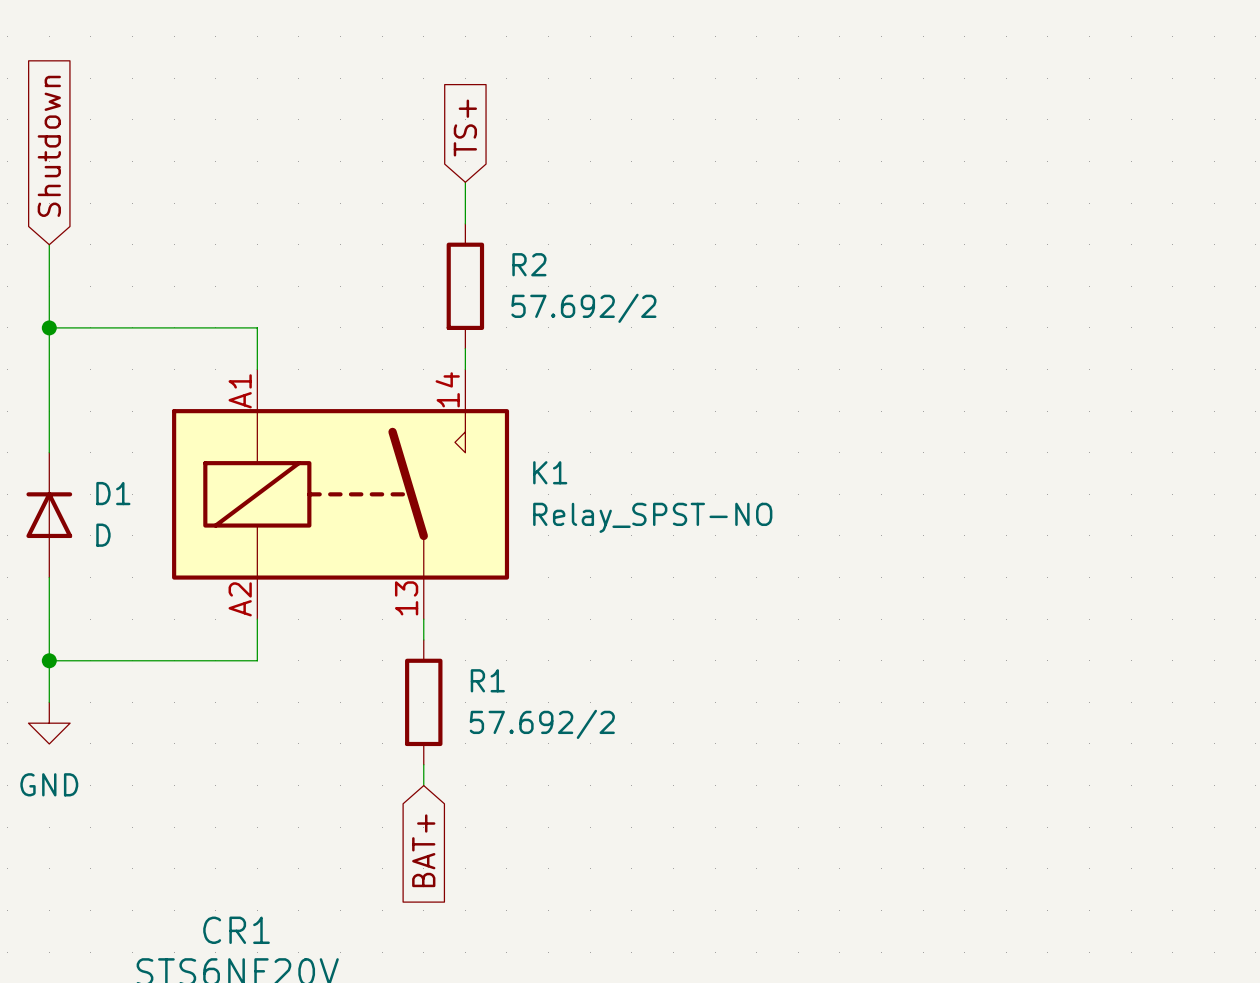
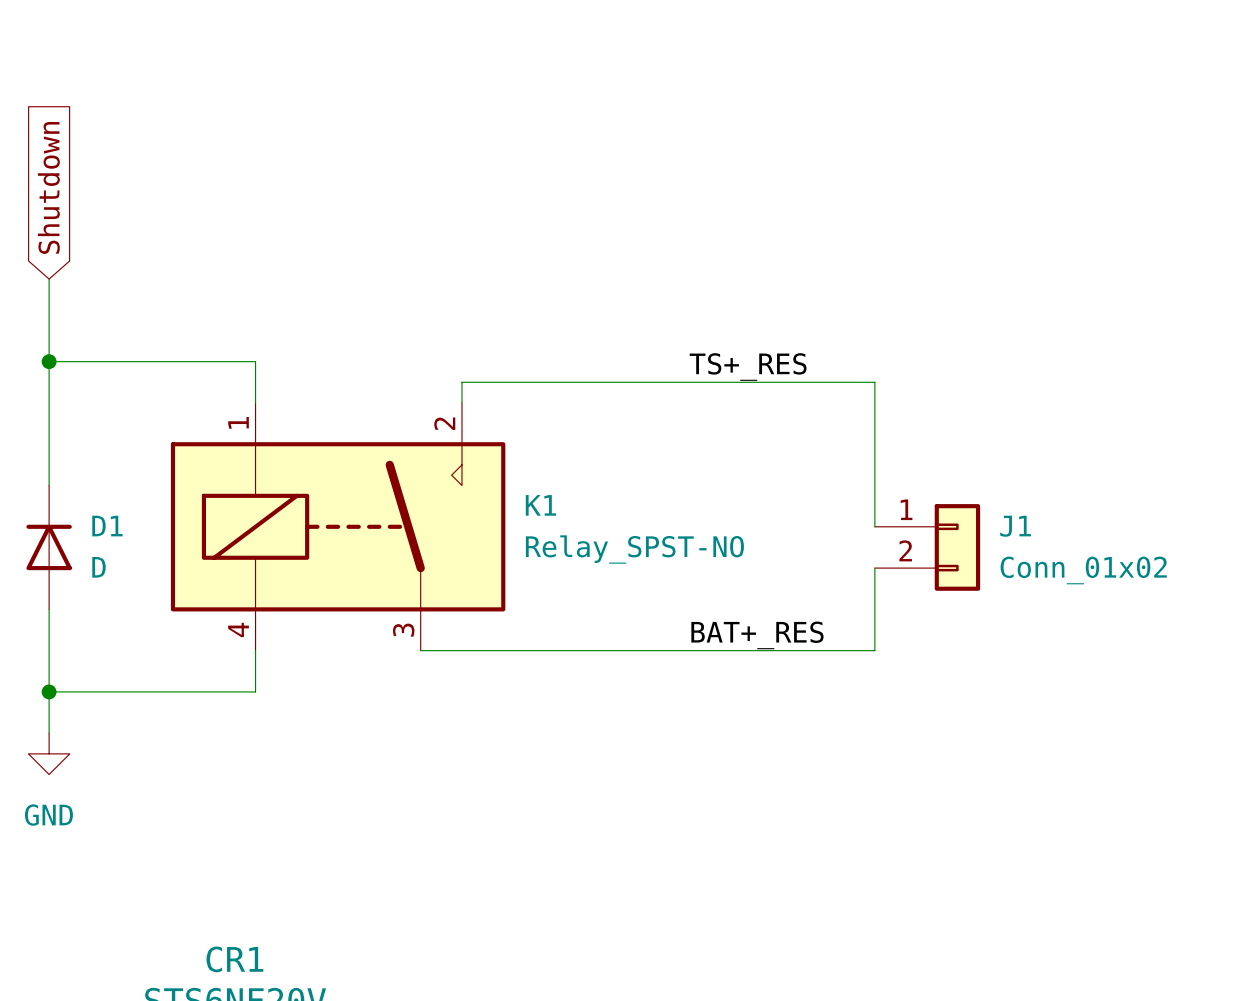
global label: TS+ (465, 128) -> none
wire: (465, 182) (465, 223) -> none
R2: 57.692/2 (465, 286) -> none
label: none -> TS+_RES (748, 367)
wire: none -> (461, 382) (874, 382) (874, 526)
K1 pin number: 14 (447, 389) -> 2 (444, 423)
K1 pin number: A1 (240, 391) -> 1 (238, 422)
J1: none -> Conn_01x02 (927, 547)
K1 pin number: 13 (406, 598) -> 3 (403, 630)
K1 pin number: A2 (240, 599) -> 4 (238, 629)
label: none -> BAT+_RES (757, 635)
wire: (423, 619) (423, 639) -> (420, 650) (874, 650) (874, 568)
R1: 57.692/2 (423, 702) -> none
wire: (423, 764) (423, 785) -> none
global label: BAT+ (423, 850) -> none

